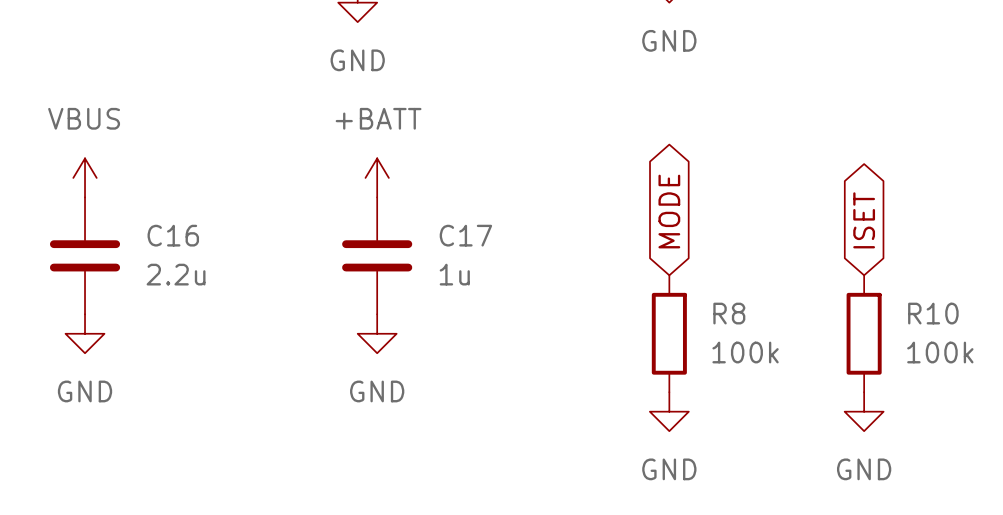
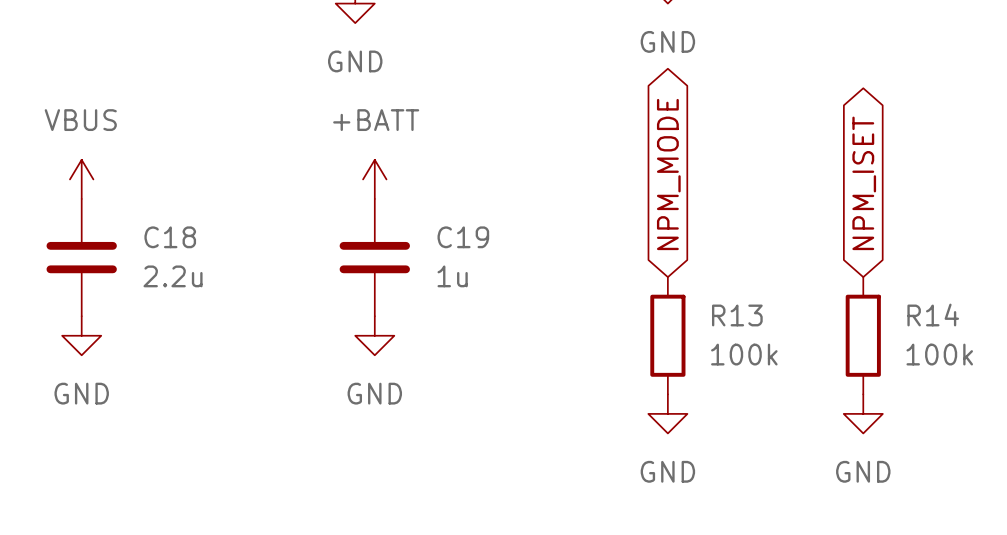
global label: MODE (669, 211) -> NPM_MODE (668, 174)
global label: ISET (864, 220) -> NPM_ISET (864, 183)
C16 name: C16 (173, 235) -> C18 (170, 237)
C17 name: C17 (465, 235) -> C19 (463, 237)
R8 name: R8 (729, 313) -> R13 (737, 315)
R10 name: R10 (933, 313) -> R14 (933, 315)

